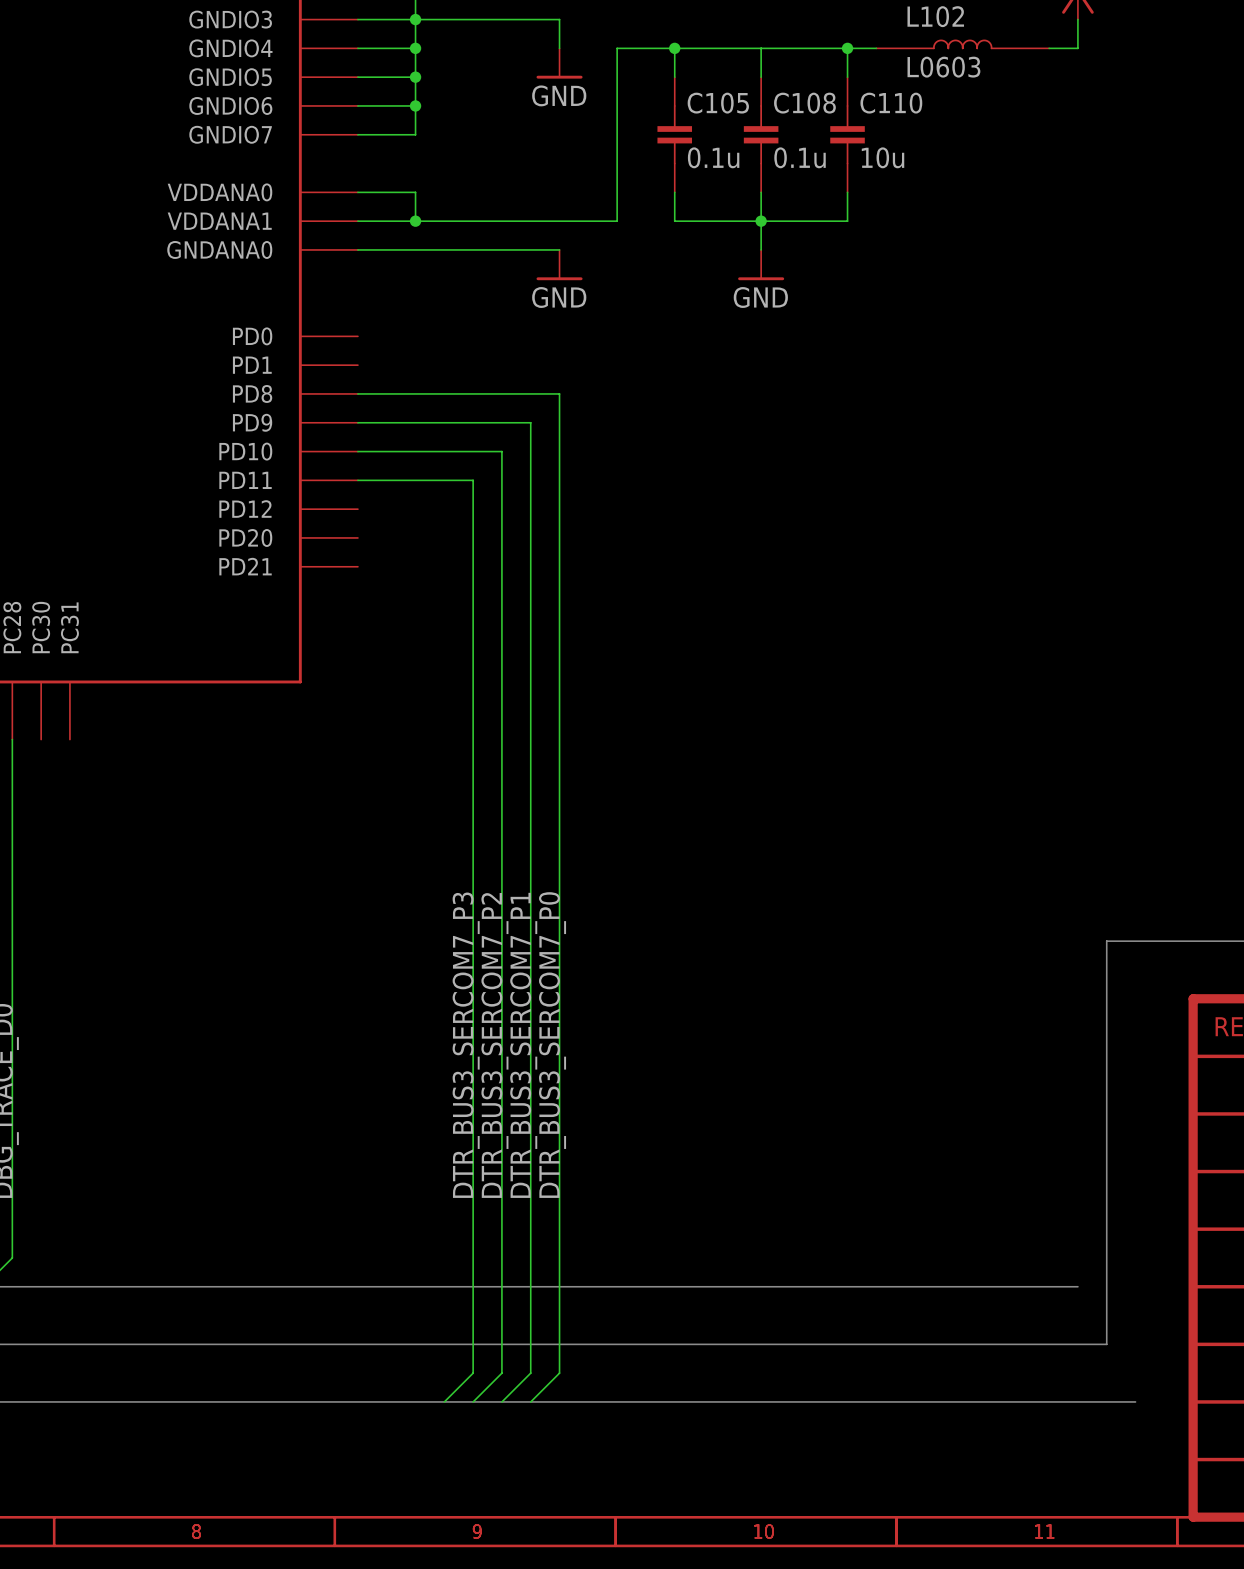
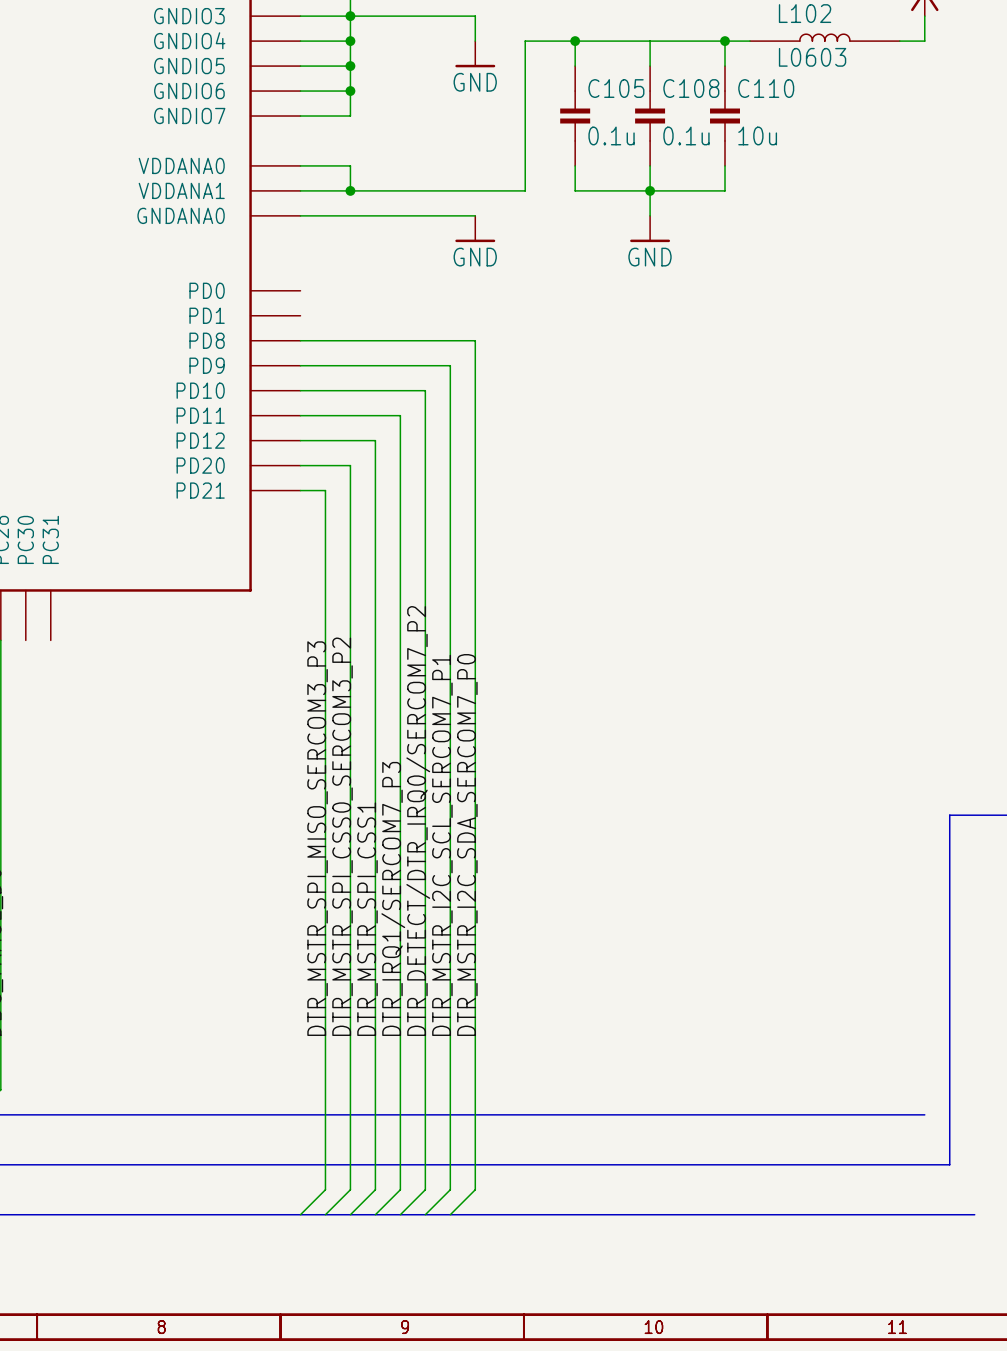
wire: none -> (300, 440) (375, 440) (375, 1189) (350, 1214)
wire: none -> (300, 465) (350, 465) (350, 1189) (325, 1214)
wire: none -> (300, 490) (325, 490) (325, 1189) (300, 1214)
label: none -> DTR_MSTR_SPI_MISO_SERCOM3_P3 (317, 838)
label: none -> DTR_MSTR_SPI_CSS0_SERCOM3_P2 (342, 836)
label: DTR_BUS3_SERCOM7_P3 (466, 1045) -> DTR_IRQ1/SERCOM7_P3 (393, 898)
label: DTR_BUS3_SERCOM7_P2 (494, 1045) -> DTR_DETECT/DTR_IRQ0/SERCOM7_P2 (418, 821)
label: DTR_BUS3_SERCOM7_P1 (523, 1045) -> DTR_MSTR_I2C_SCL_SERCOM7_P1 (442, 845)
label: DTR_BUS3_SERCOM7_P0 (552, 1045) -> DTR_MSTR_I2C_SDA_SERCOM7_P0 (467, 844)
label: none -> DTR_MSTR_SPI_CSS1 (367, 919)

